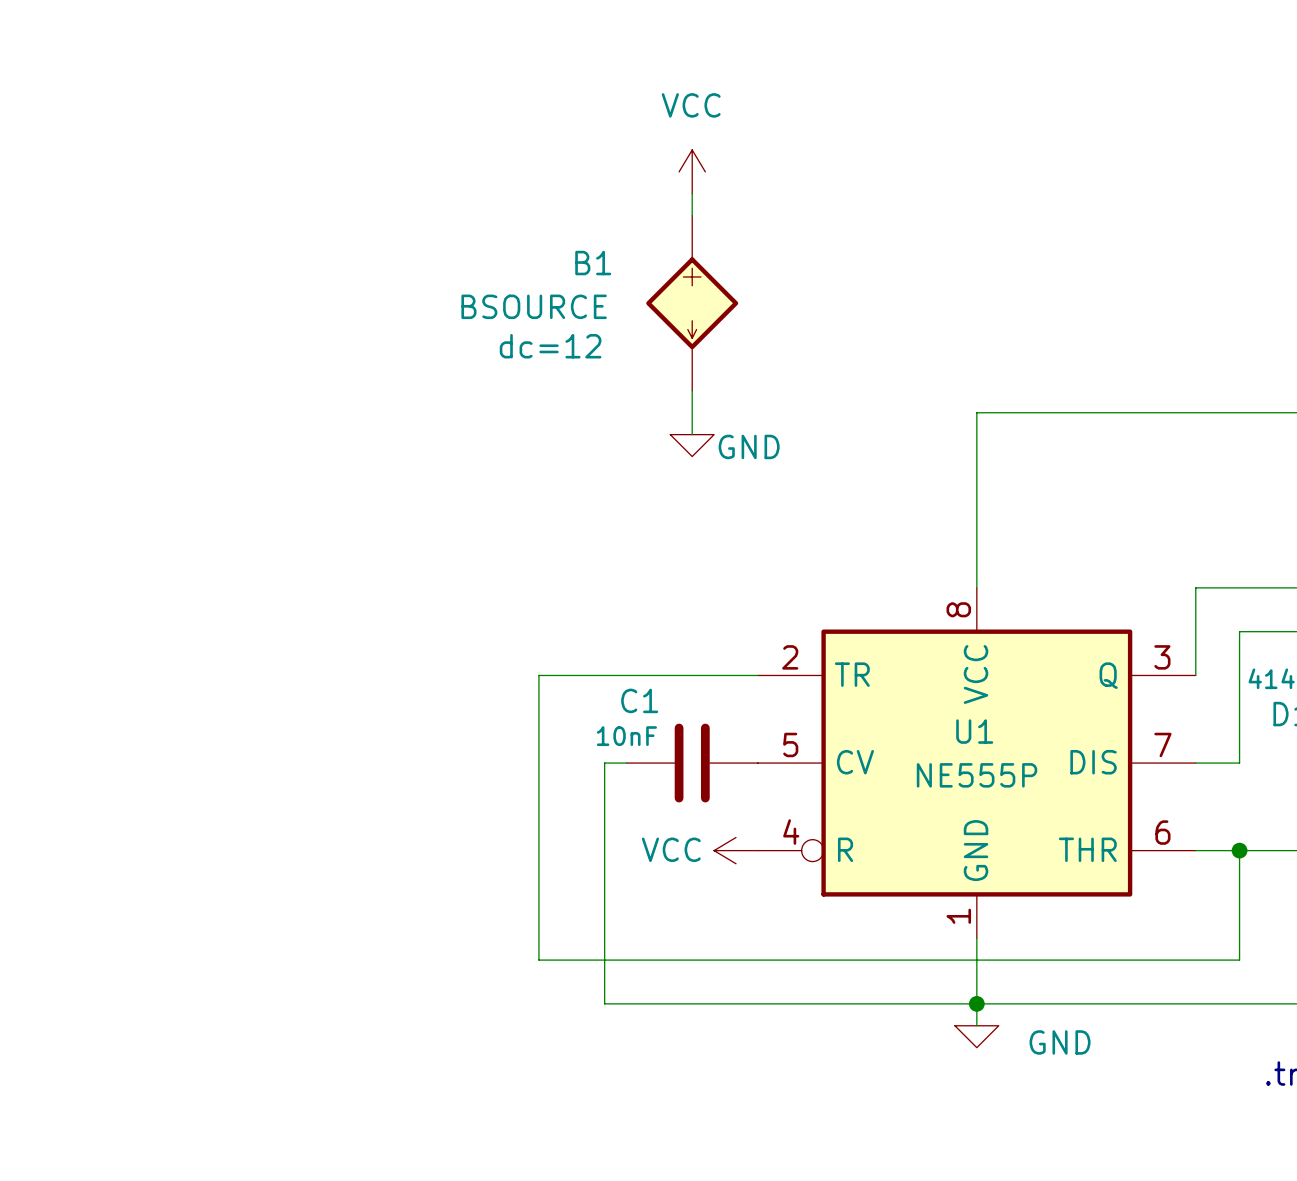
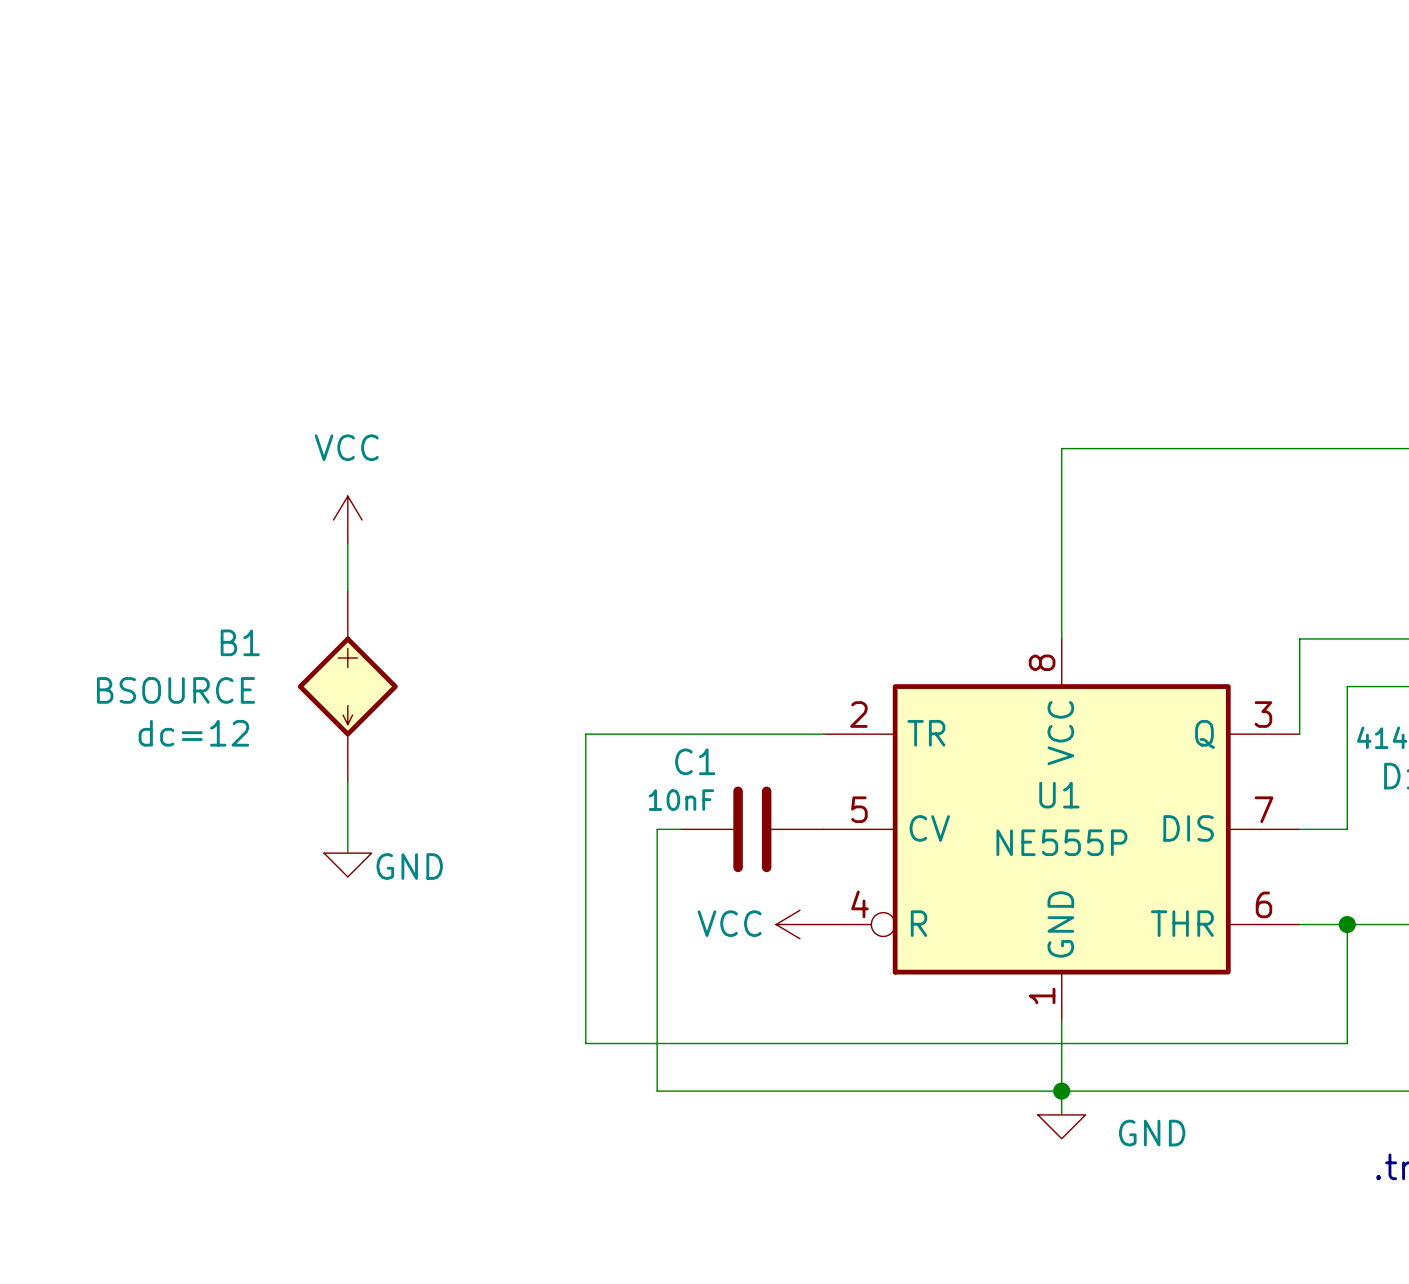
power symbol: VCC (692, 171) -> none
wire: (692, 193) (692, 215) -> none
B1 position: (692, 303) -> (347, 686)
wire: (692, 390) (692, 434) -> (347, 543) (347, 591)
power symbol: GND (692, 445) -> none
power symbol: none -> VCC (347, 519)
wire: none -> (347, 781) (347, 853)
power symbol: none -> GND (347, 865)

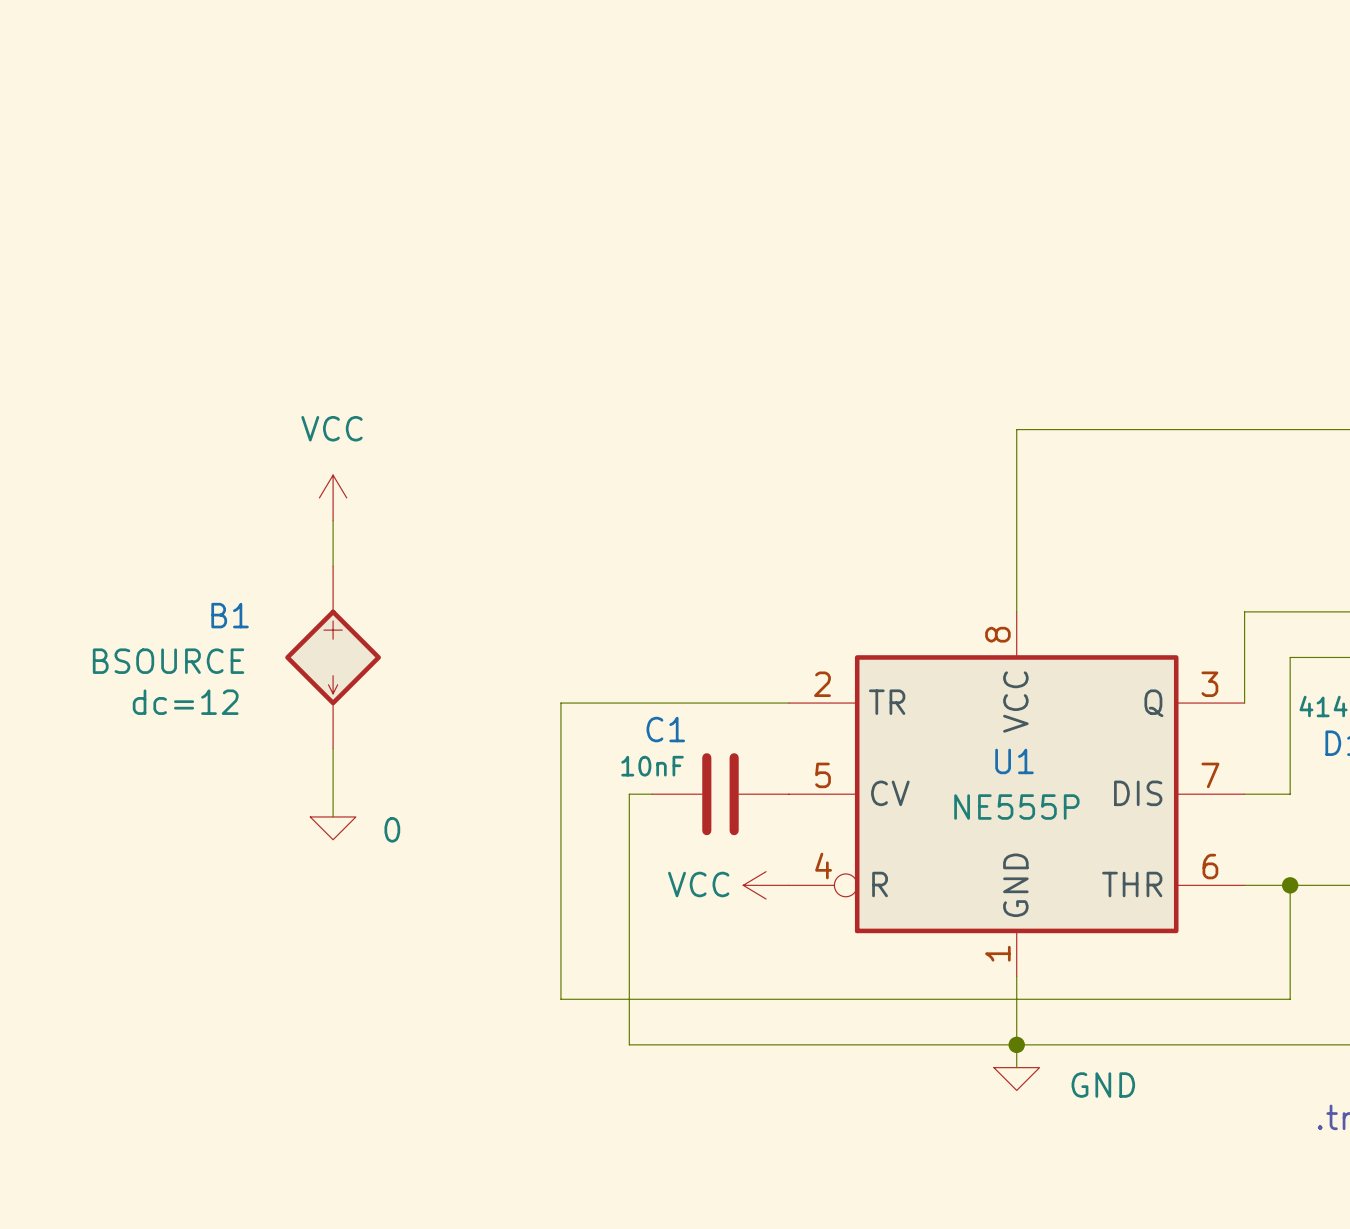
power symbol: GND (347, 865) -> 0 (333, 828)

